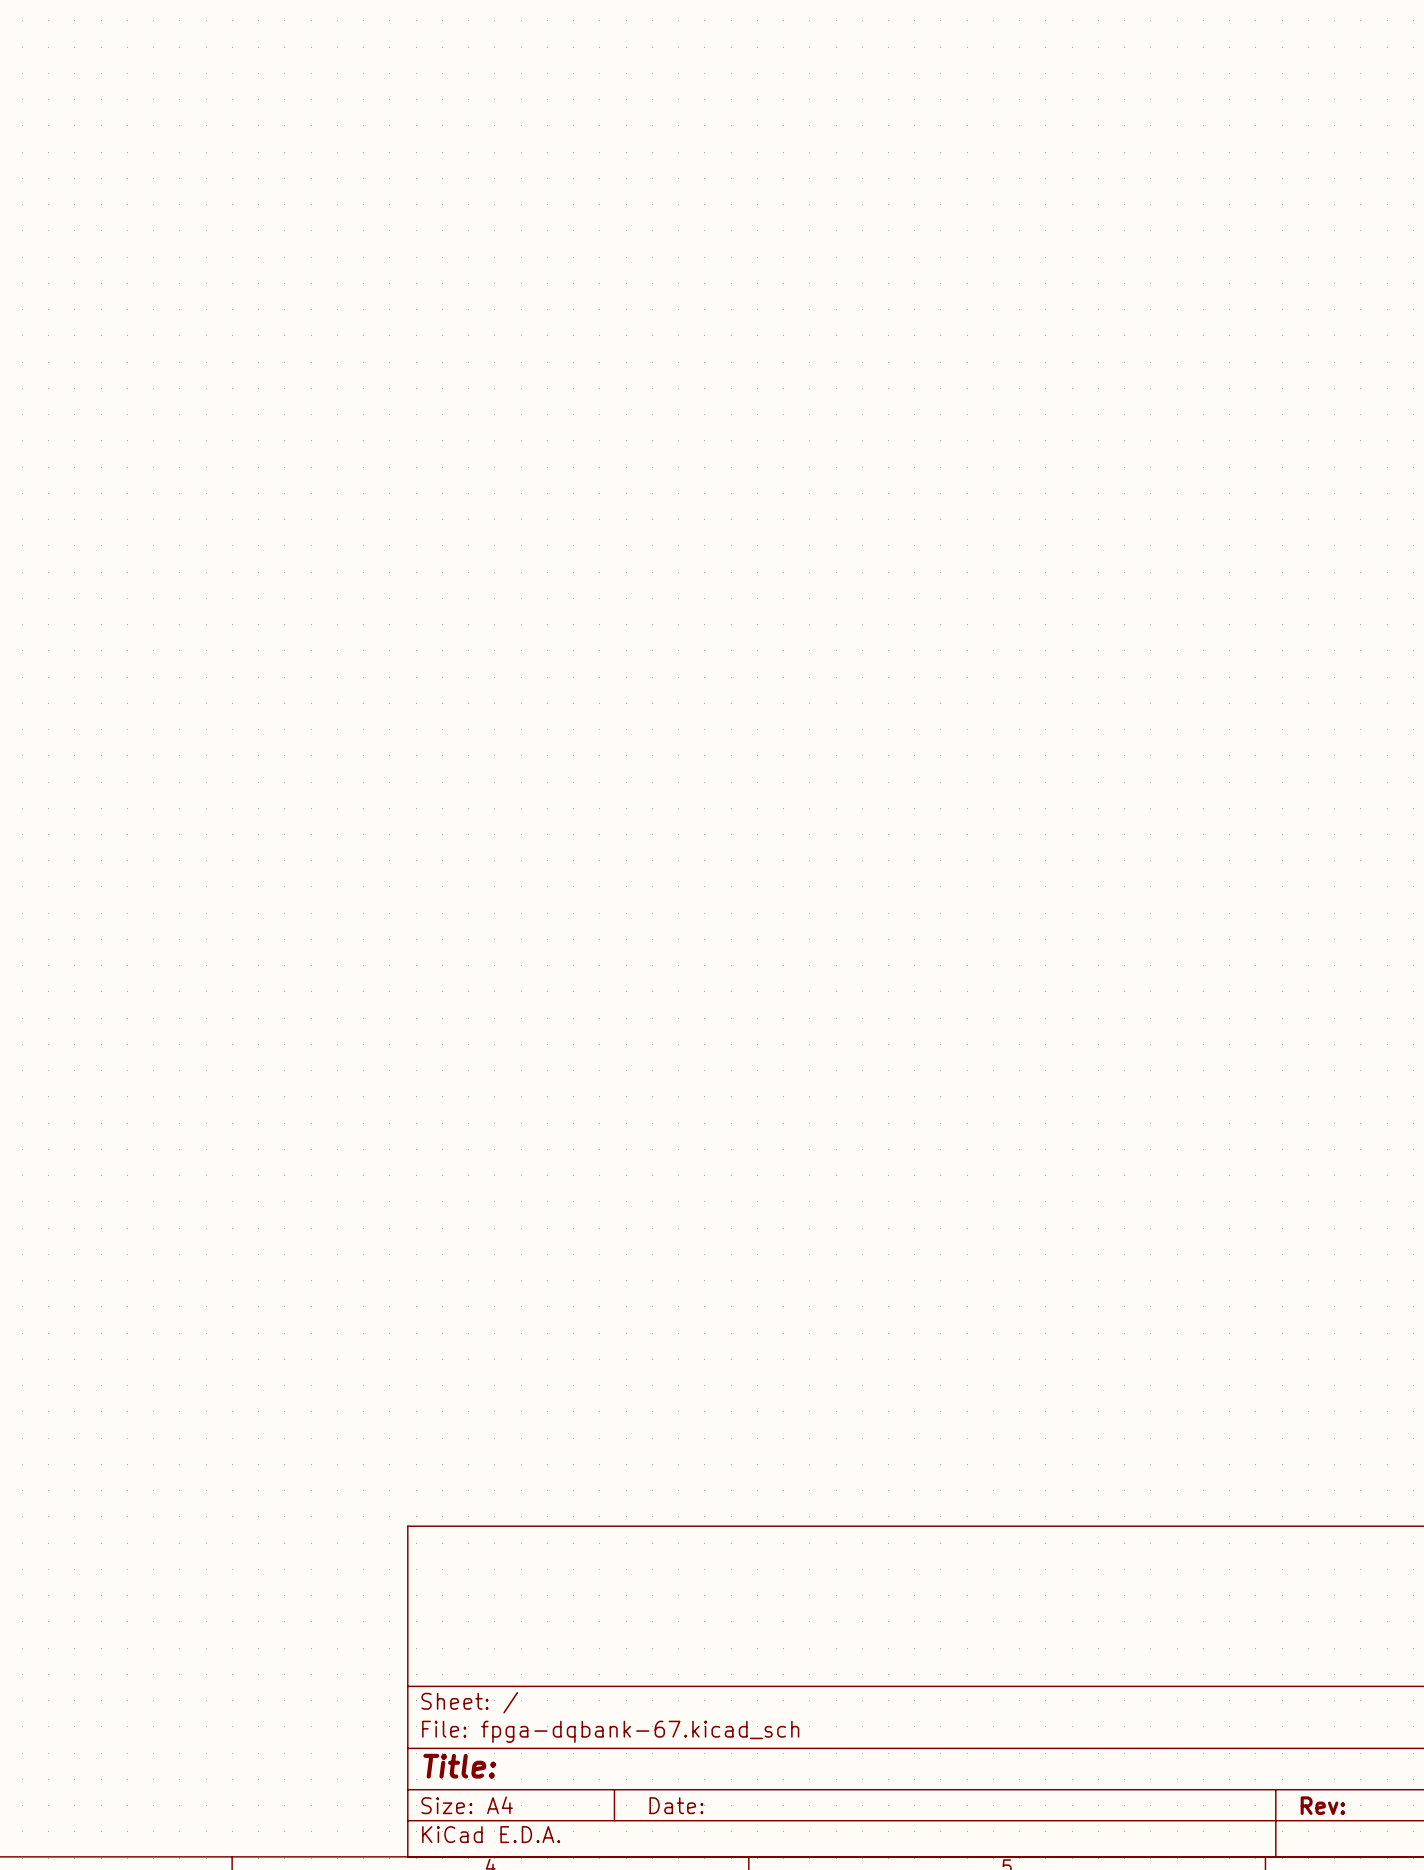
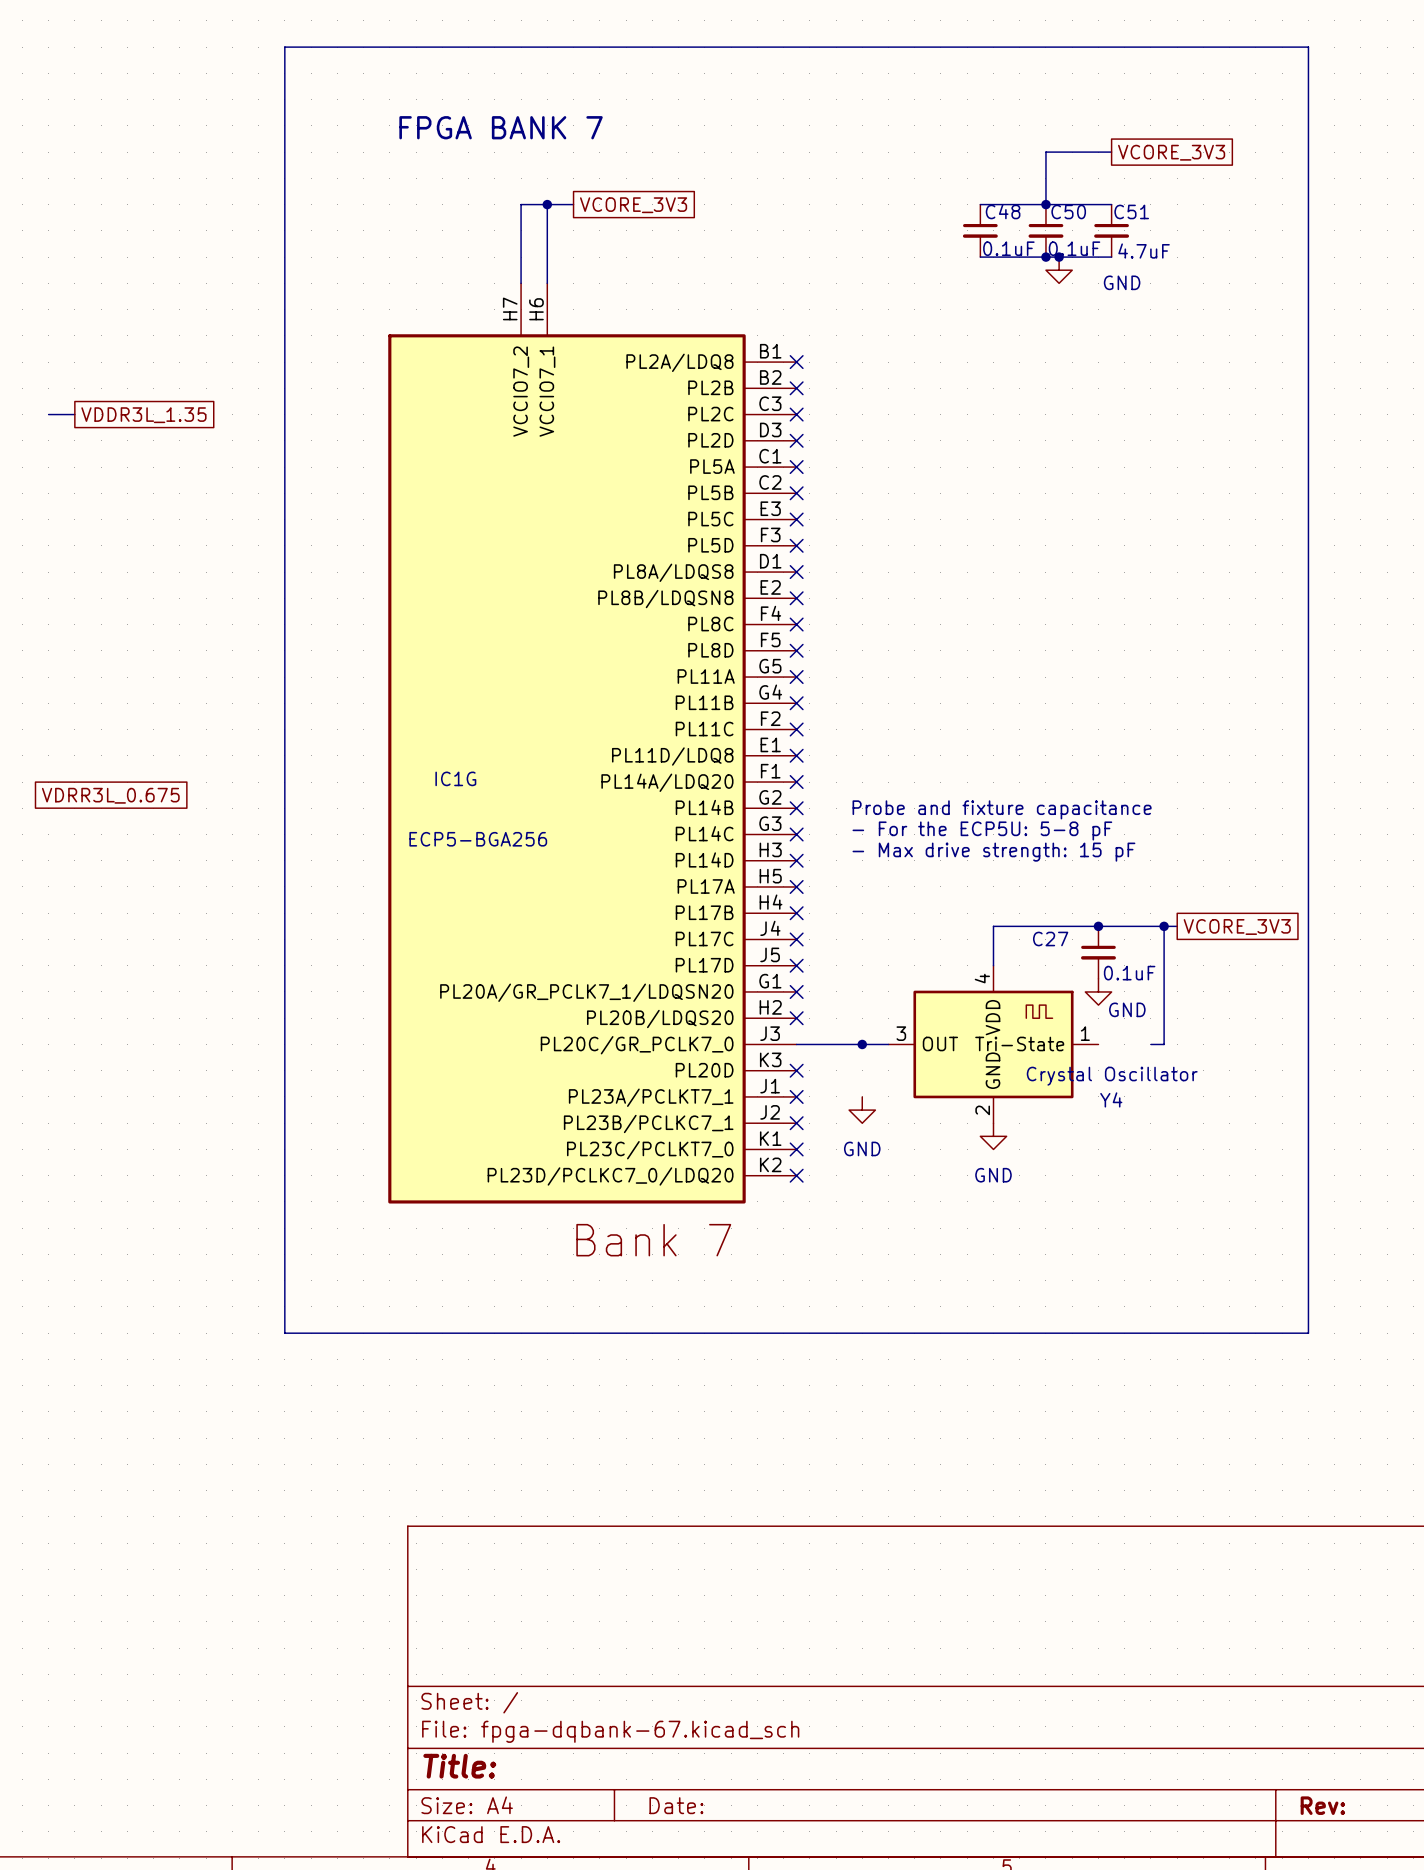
line: none -> (284, 47) (1308, 47) (1308, 1333) (284, 1333) (284, 47)
text: none -> FPGA BANK 7 (501, 127)
wire: none -> (1111, 152) (1045, 152) (1045, 204)
global label: none -> VCORE_3V3 (1171, 152)
wire: none -> (547, 204) (547, 283)
junction: none -> (547, 204)
wire: none -> (573, 204) (521, 204) (521, 283)
wire: none -> (980, 204) (1111, 204)
junction: none -> (1045, 204)
global label: none -> VCORE_3V3 (633, 205)
C48: none -> 0.1uF (980, 230)
C50: none -> 0.1uF (1045, 230)
C51: none -> 4.7uF (1111, 230)
wire: none -> (980, 257) (1111, 257)
junction: none -> (1045, 257)
junction: none -> (1059, 257)
power symbol: none -> GND (1059, 270)
no-connect mark: none -> (796, 362)
no-connect mark: none -> (796, 388)
wire: none -> (48, 414) (74, 414)
no-connect mark: none -> (796, 414)
global label: none -> VDDR3L_1.35 (143, 415)
no-connect mark: none -> (796, 440)
no-connect mark: none -> (796, 467)
no-connect mark: none -> (796, 493)
no-connect mark: none -> (796, 519)
no-connect mark: none -> (796, 545)
no-connect mark: none -> (796, 572)
no-connect mark: none -> (796, 598)
no-connect mark: none -> (796, 624)
no-connect mark: none -> (796, 650)
no-connect mark: none -> (796, 677)
no-connect mark: none -> (796, 703)
no-connect mark: none -> (796, 729)
IC1G: none -> ECP5-BGA256 (592, 743)
no-connect mark: none -> (796, 755)
no-connect mark: none -> (796, 782)
global label: none -> VDRR3L_0.675 (110, 795)
no-connect mark: none -> (796, 808)
text: none -> Probe and fixture capacitance (1002, 809)
text: none -> - For the ECP5U: 5-8 pF (982, 830)
no-connect mark: none -> (796, 834)
text: none -> - Max drive strength: 15 pF (993, 852)
no-connect mark: none -> (796, 860)
no-connect mark: none -> (796, 886)
no-connect mark: none -> (796, 913)
junction: none -> (1098, 926)
wire: none -> (1164, 926) (1164, 1044) (1150, 1044)
junction: none -> (1164, 926)
wire: none -> (1177, 926) (993, 926) (993, 965)
global label: none -> VCORE_3V3 (1237, 926)
no-connect mark: none -> (796, 939)
C27: none -> 0.1uF (1098, 952)
no-connect mark: none -> (796, 965)
no-connect mark: none -> (796, 991)
power symbol: none -> GND (1098, 991)
no-connect mark: none -> (796, 1018)
wire: none -> (796, 1044) (888, 1044)
junction: none -> (862, 1044)
Y4: none -> Crystal Oscillator (993, 1044)
no-connect mark: none -> (796, 1070)
no-connect mark: none -> (796, 1096)
power symbol: none -> GND (862, 1110)
no-connect mark: none -> (796, 1123)
power symbol: none -> GND (993, 1136)
no-connect mark: none -> (796, 1149)
no-connect mark: none -> (796, 1175)

